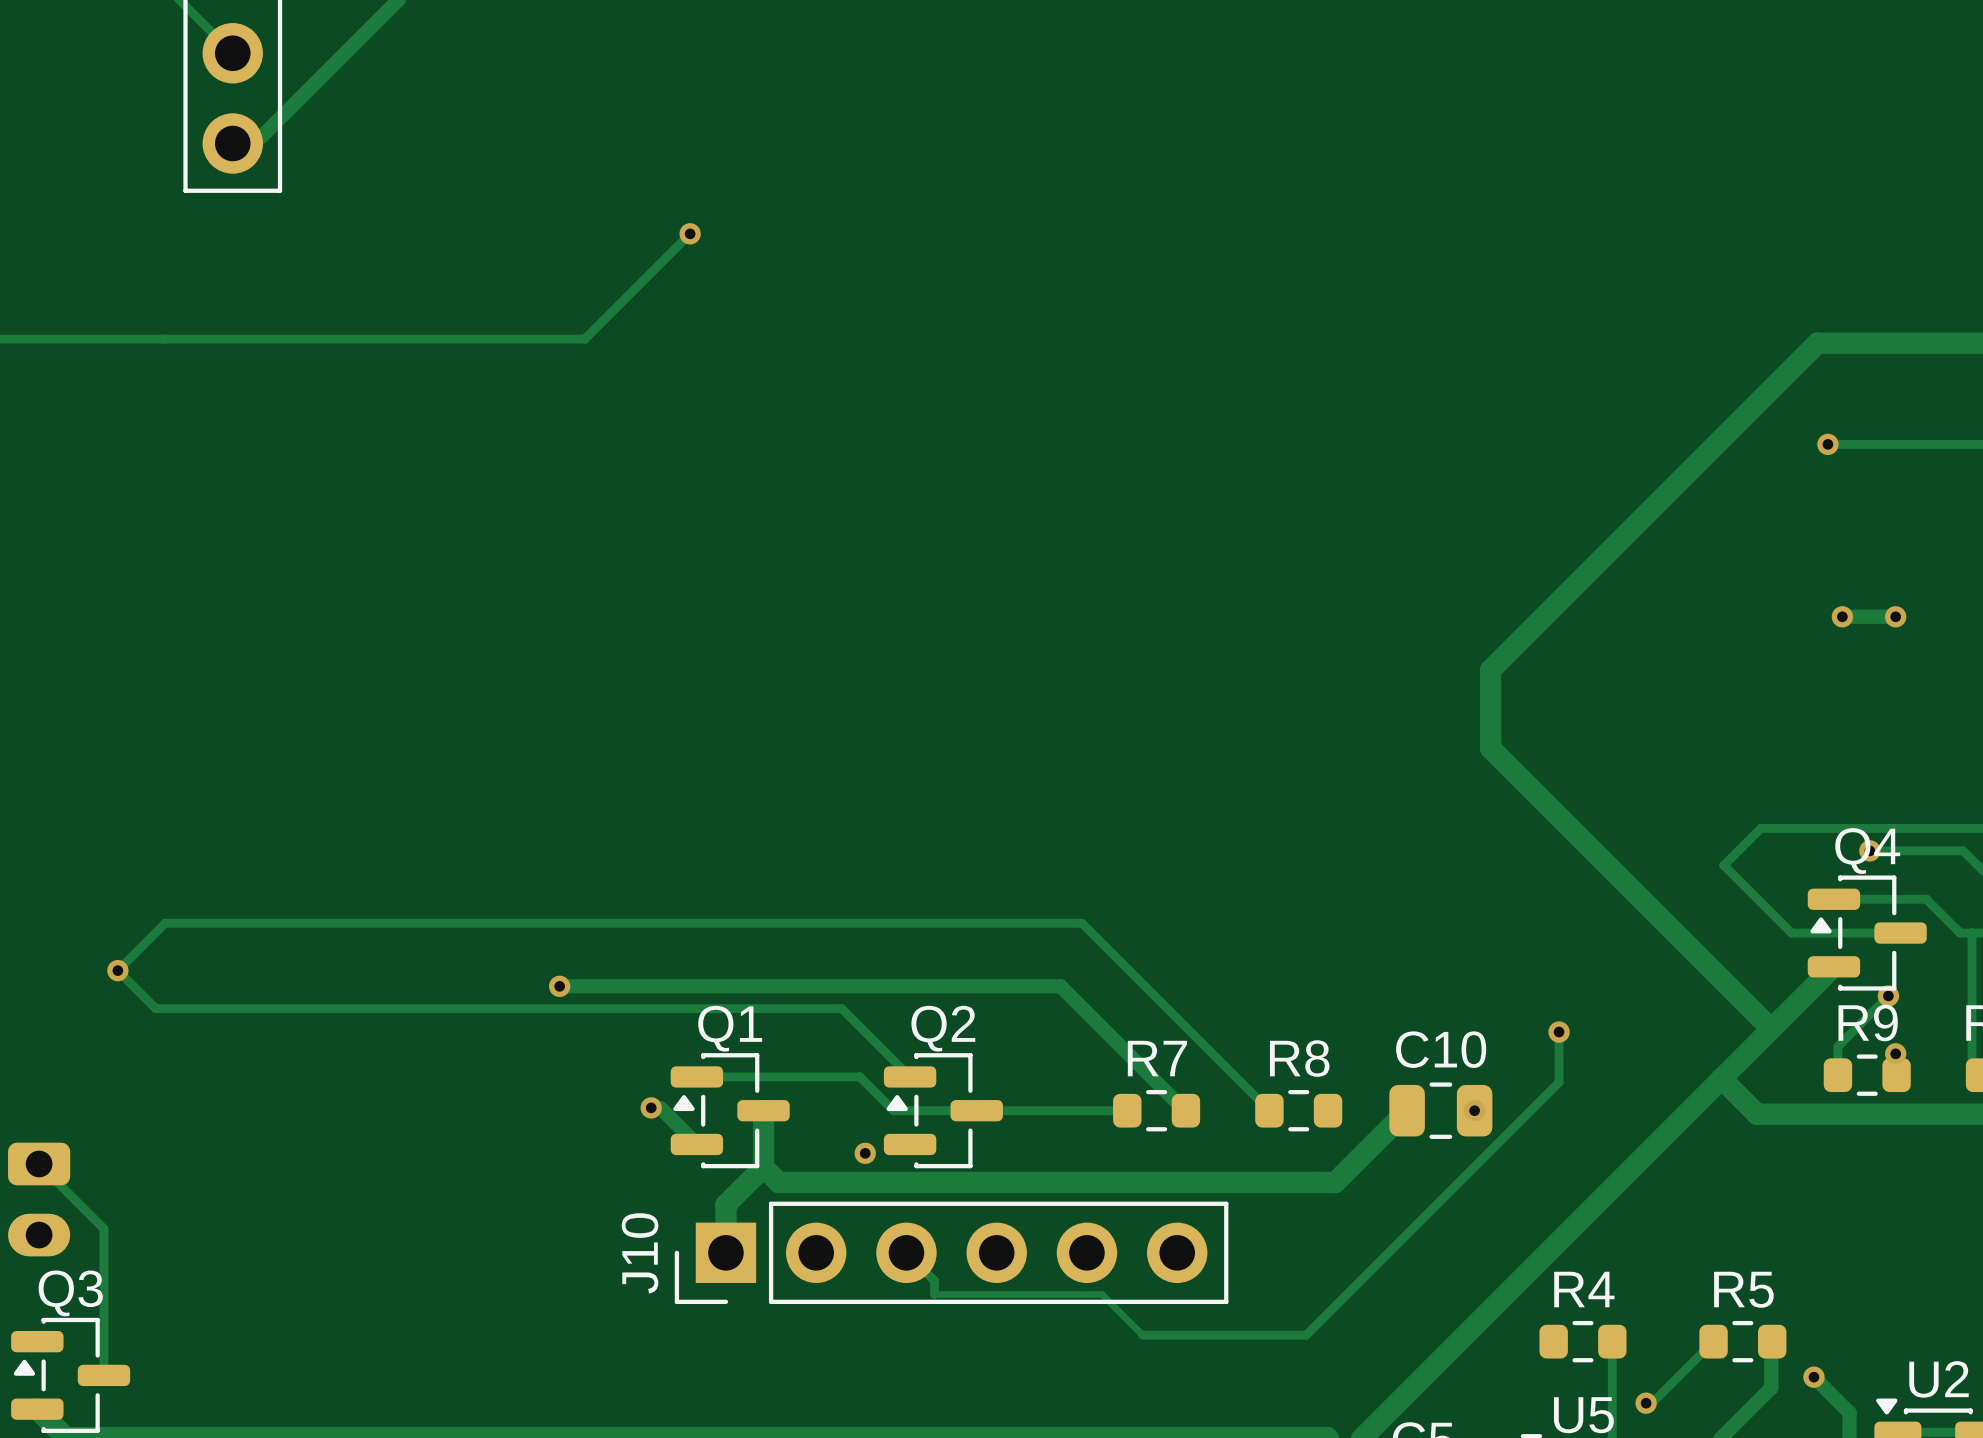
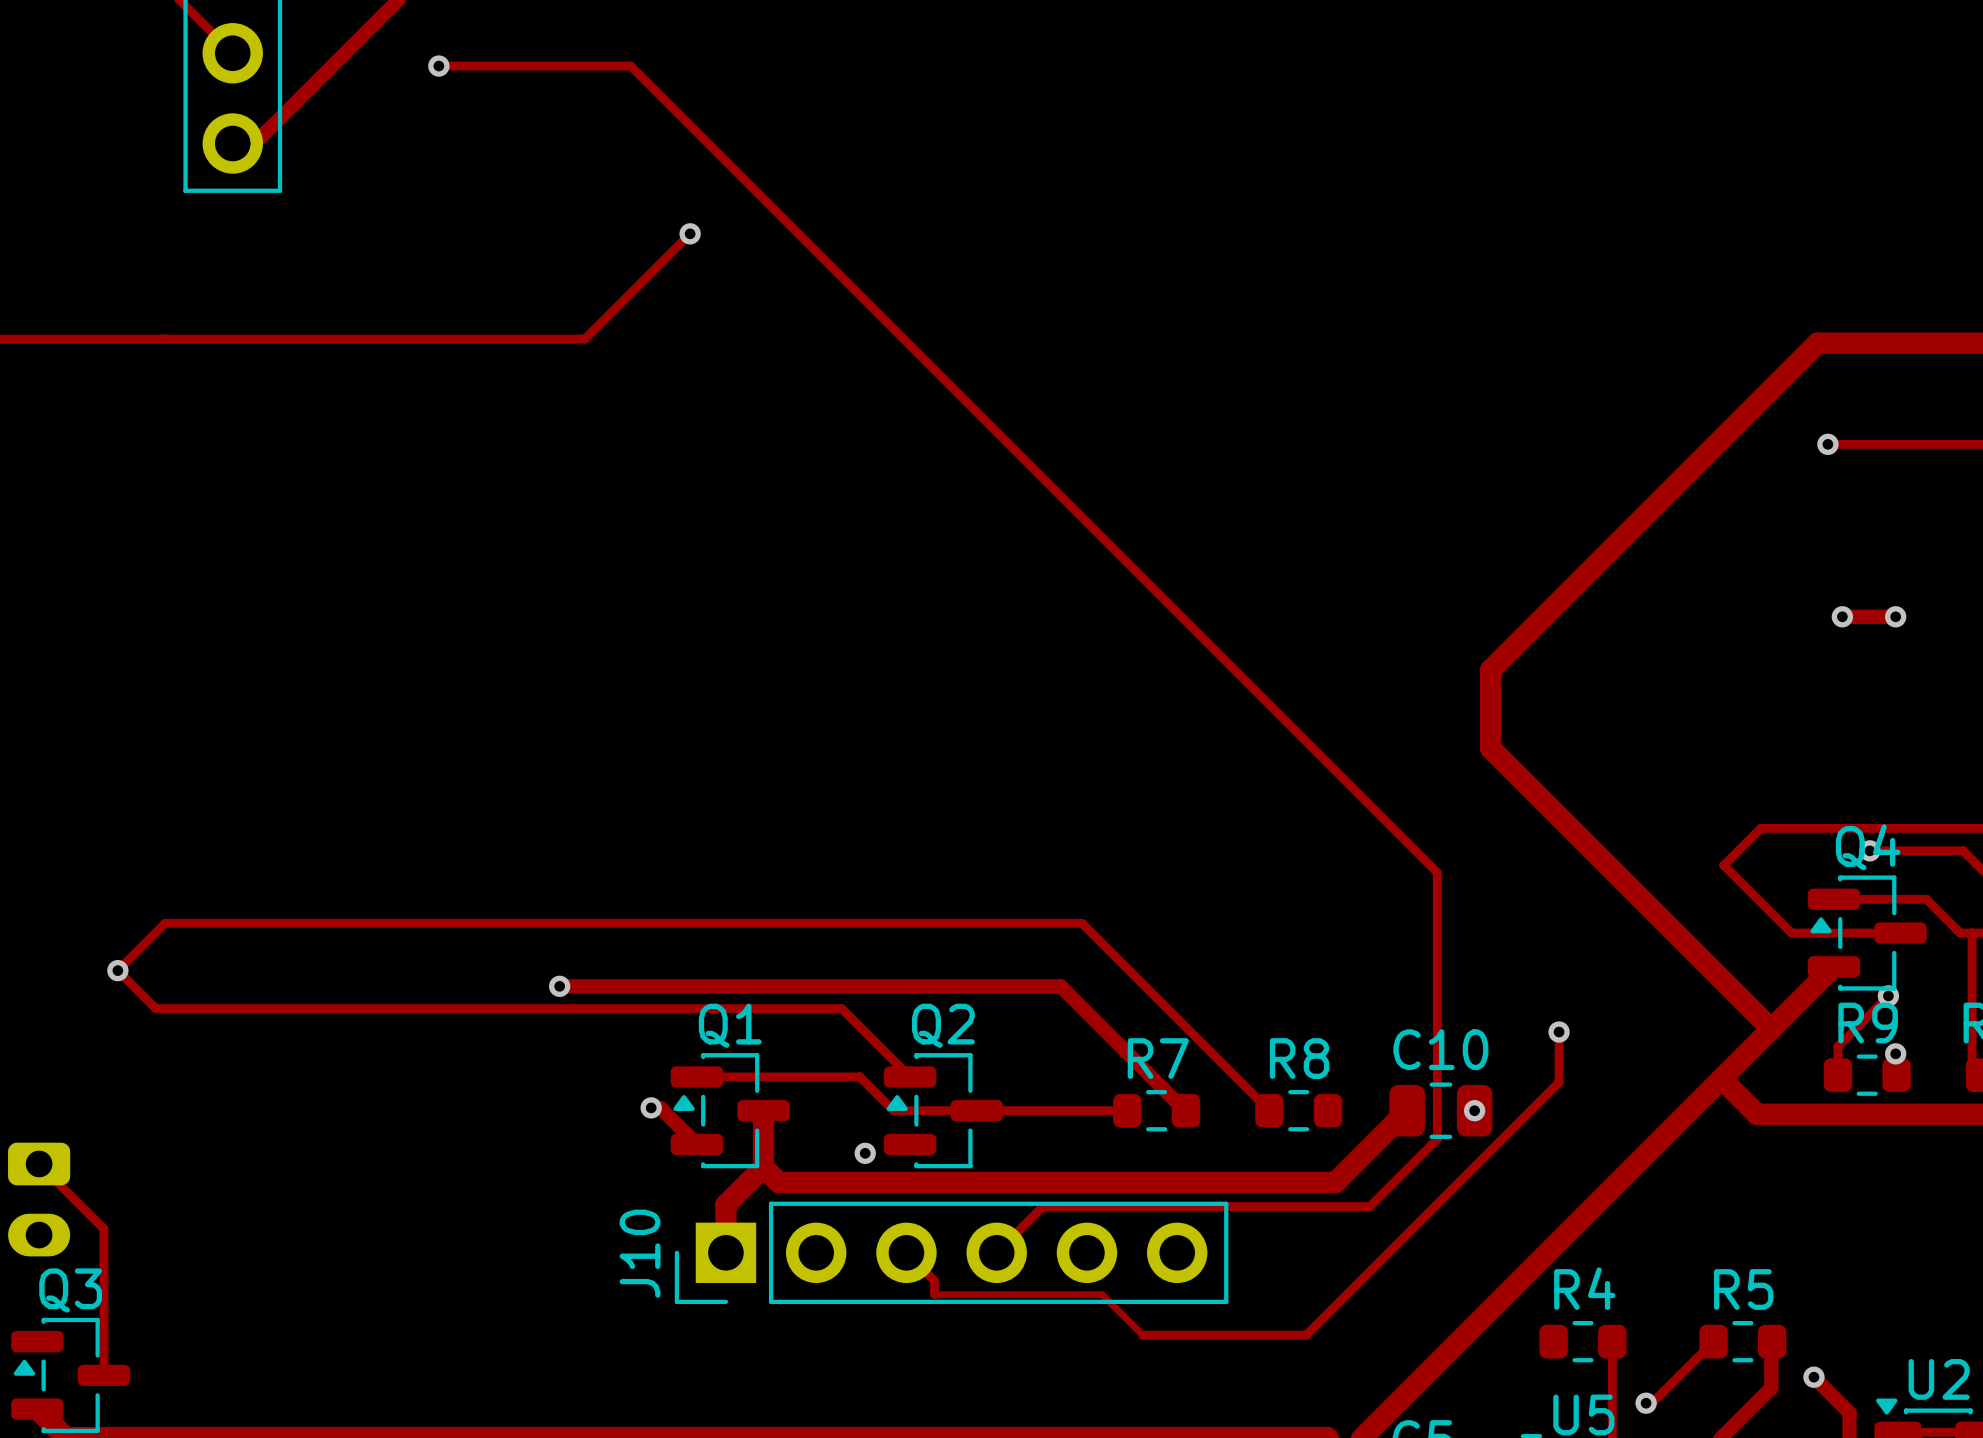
track: none -> (438, 66) (630, 66) (1437, 872) (1437, 1139) (1369, 1206) (1042, 1206) (996, 1252)
via: none -> (438, 66)

